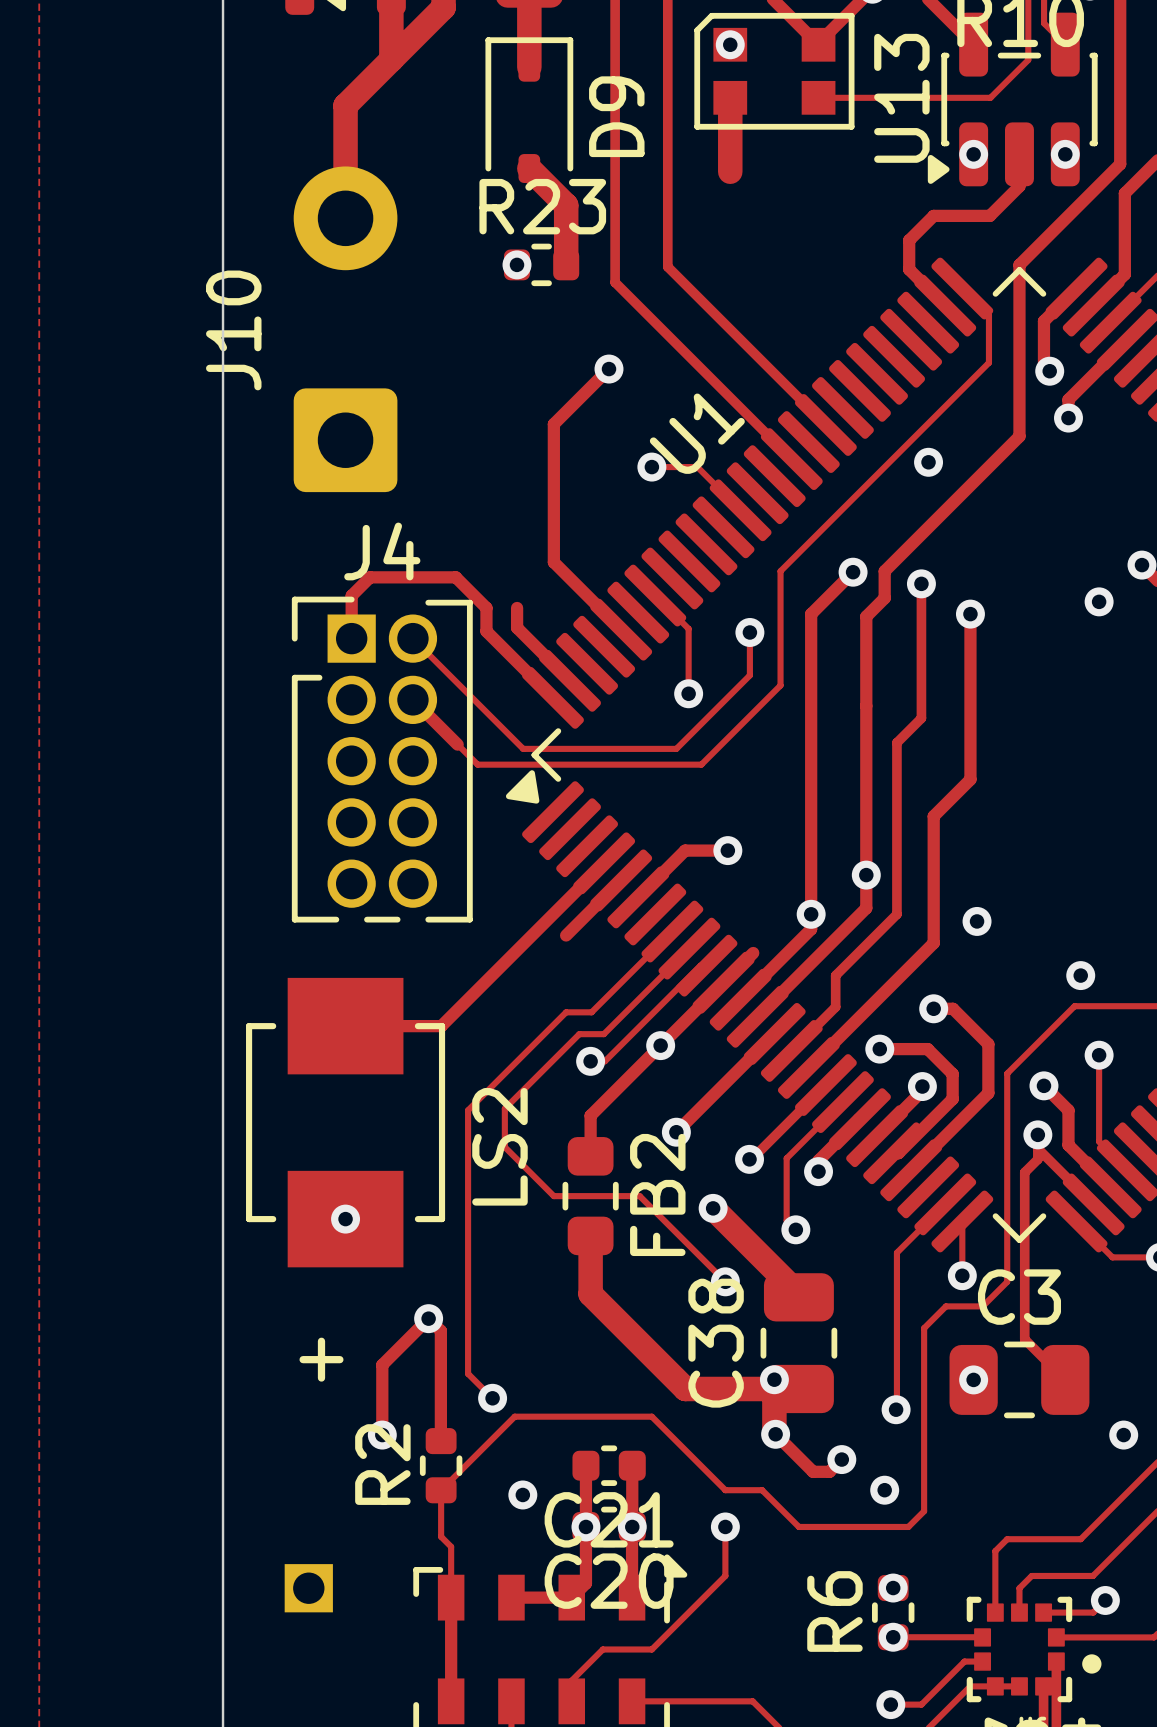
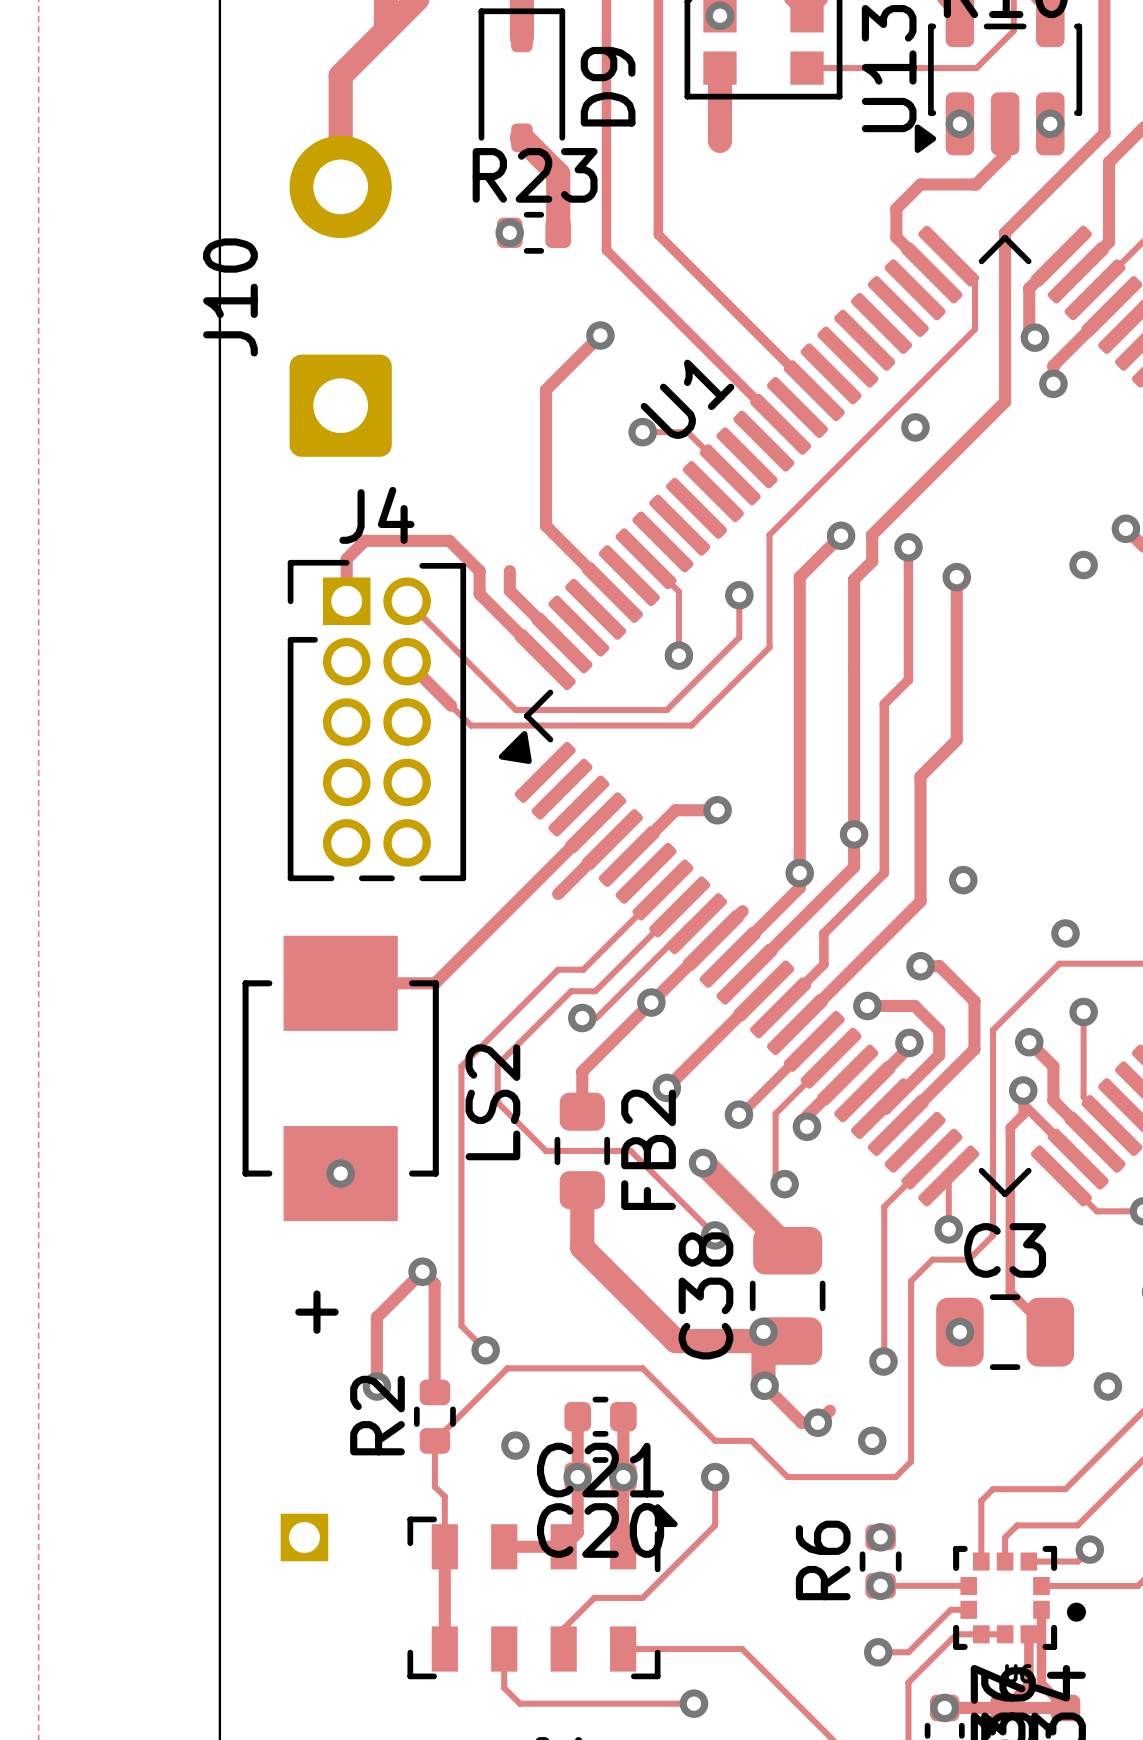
via position: (841, 1459) -> (817, 1422)

